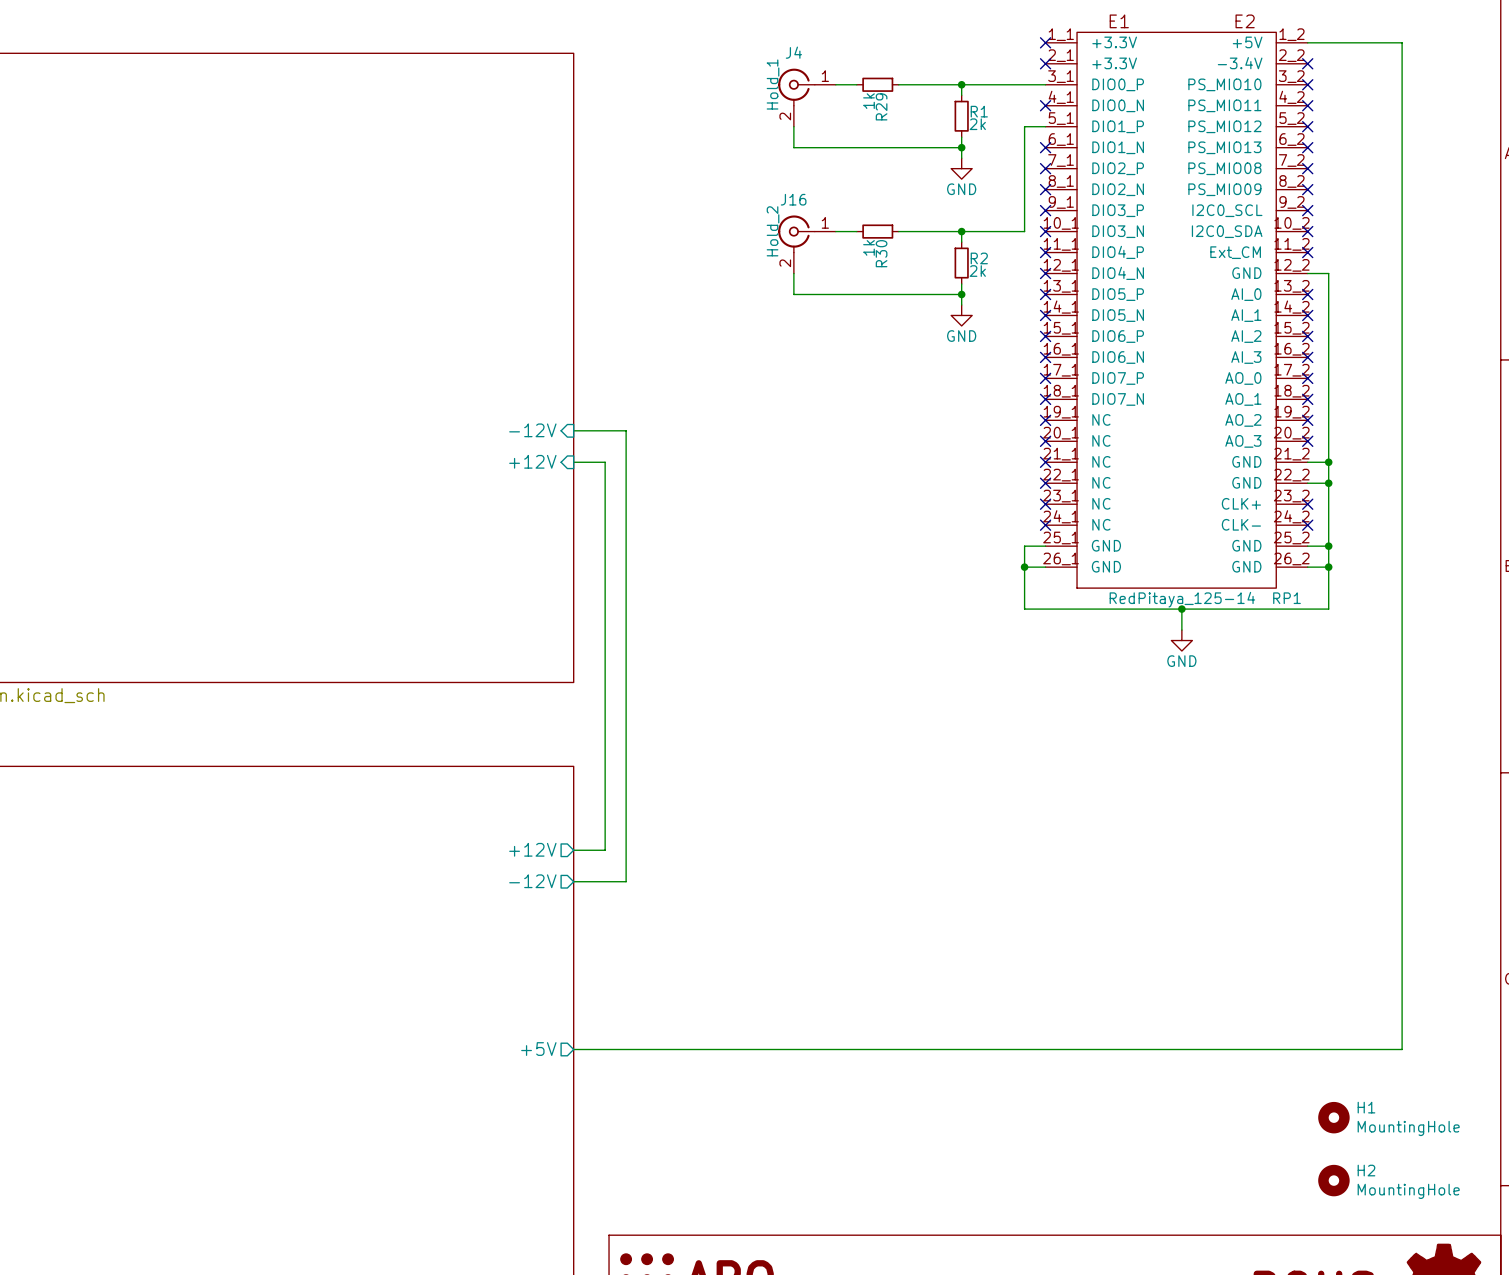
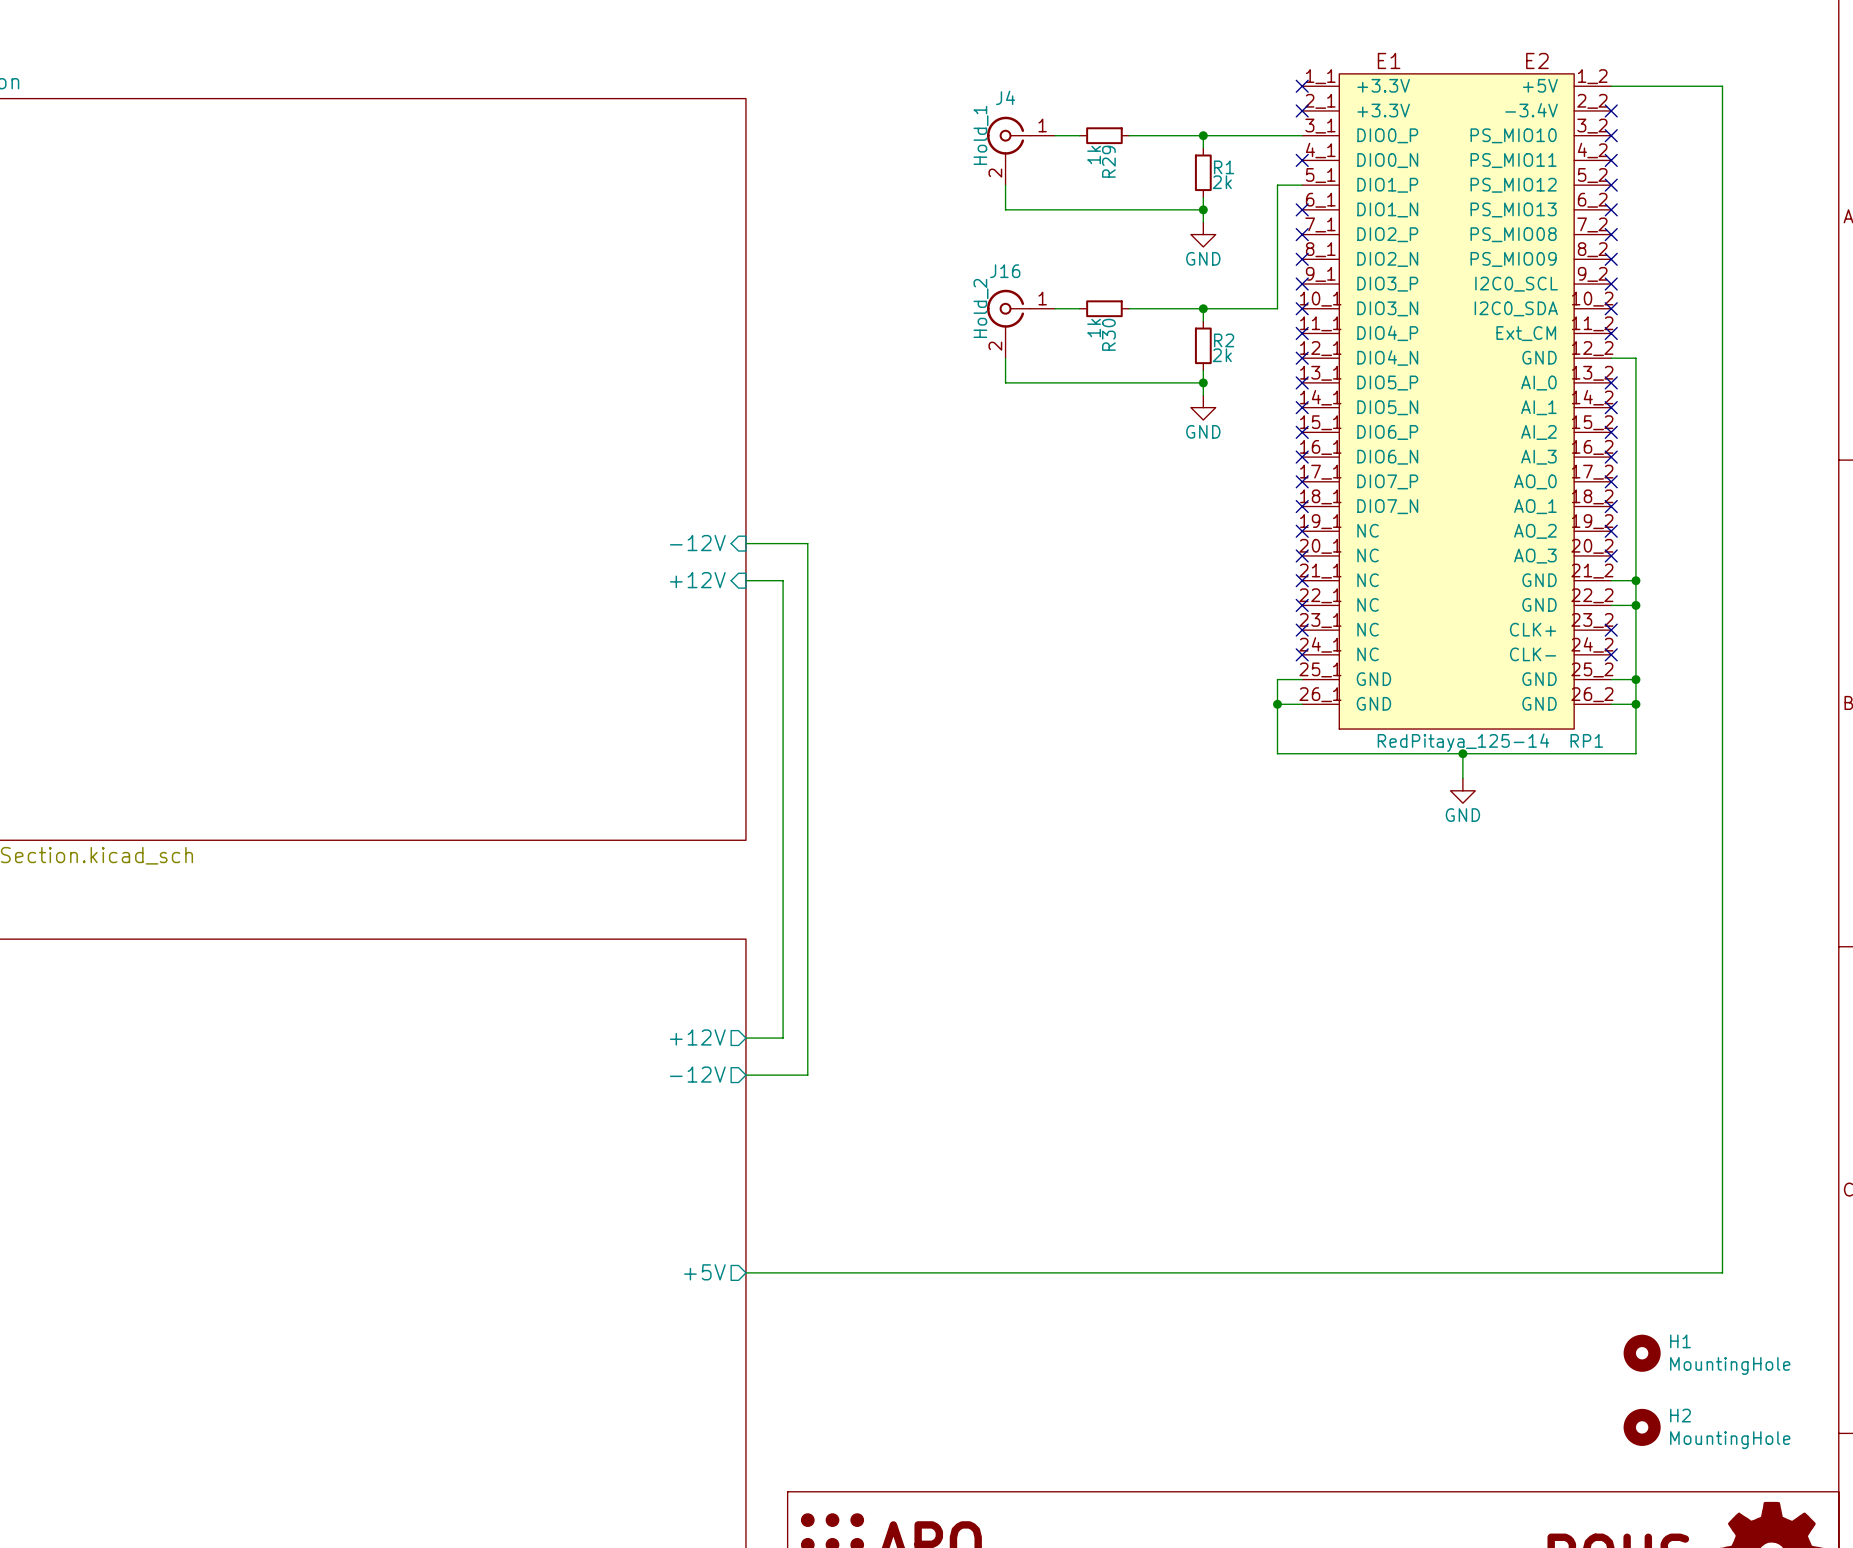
RP1 symbol: [1045, 32, 1308, 589] -> [1302, 73, 1612, 730]

